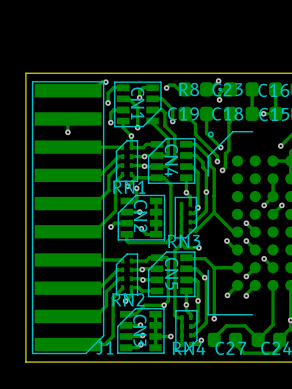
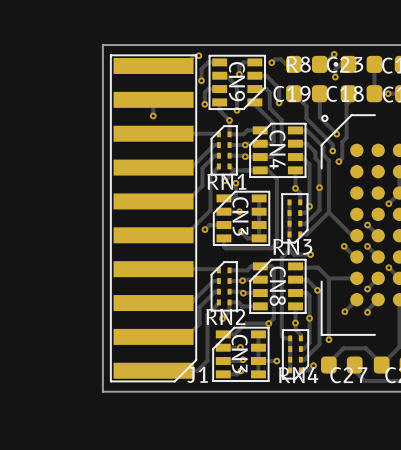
CN1 name: CN1 (137, 103) -> CN9 (236, 81)
CN2 name: CN2 (140, 216) -> CN3 (240, 216)
CN5 name: CN5 (171, 273) -> CN8 (277, 286)

